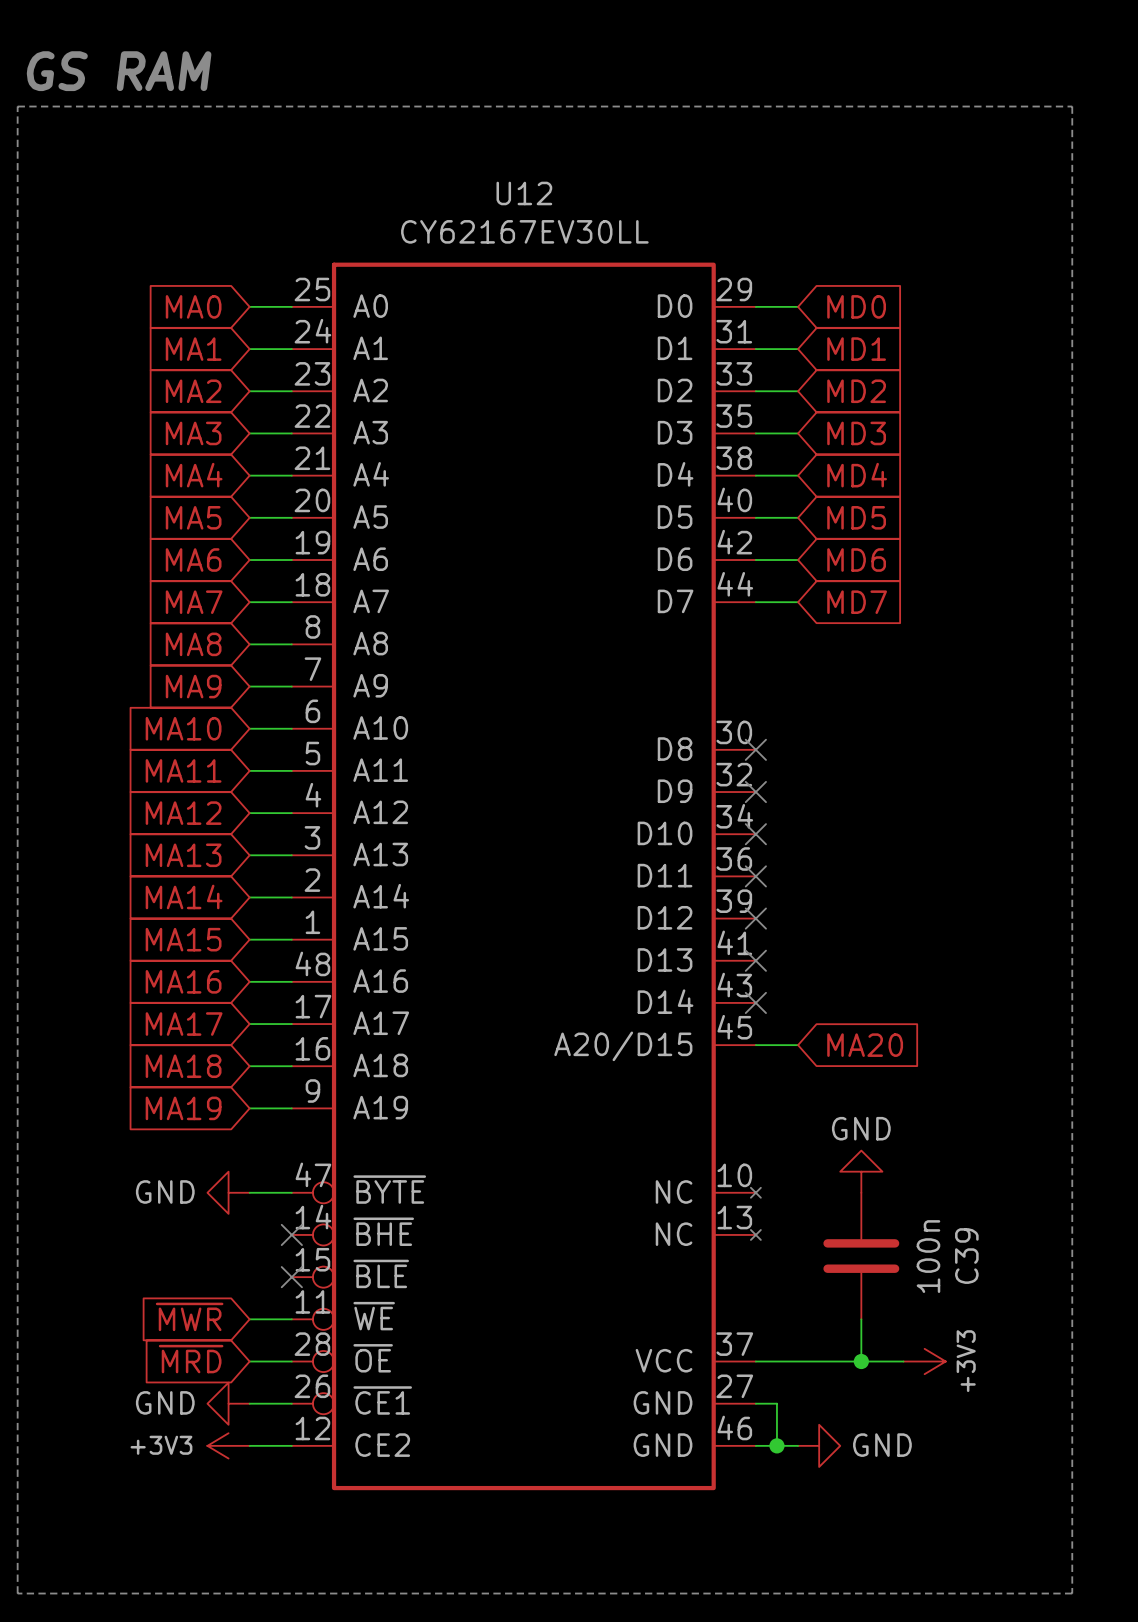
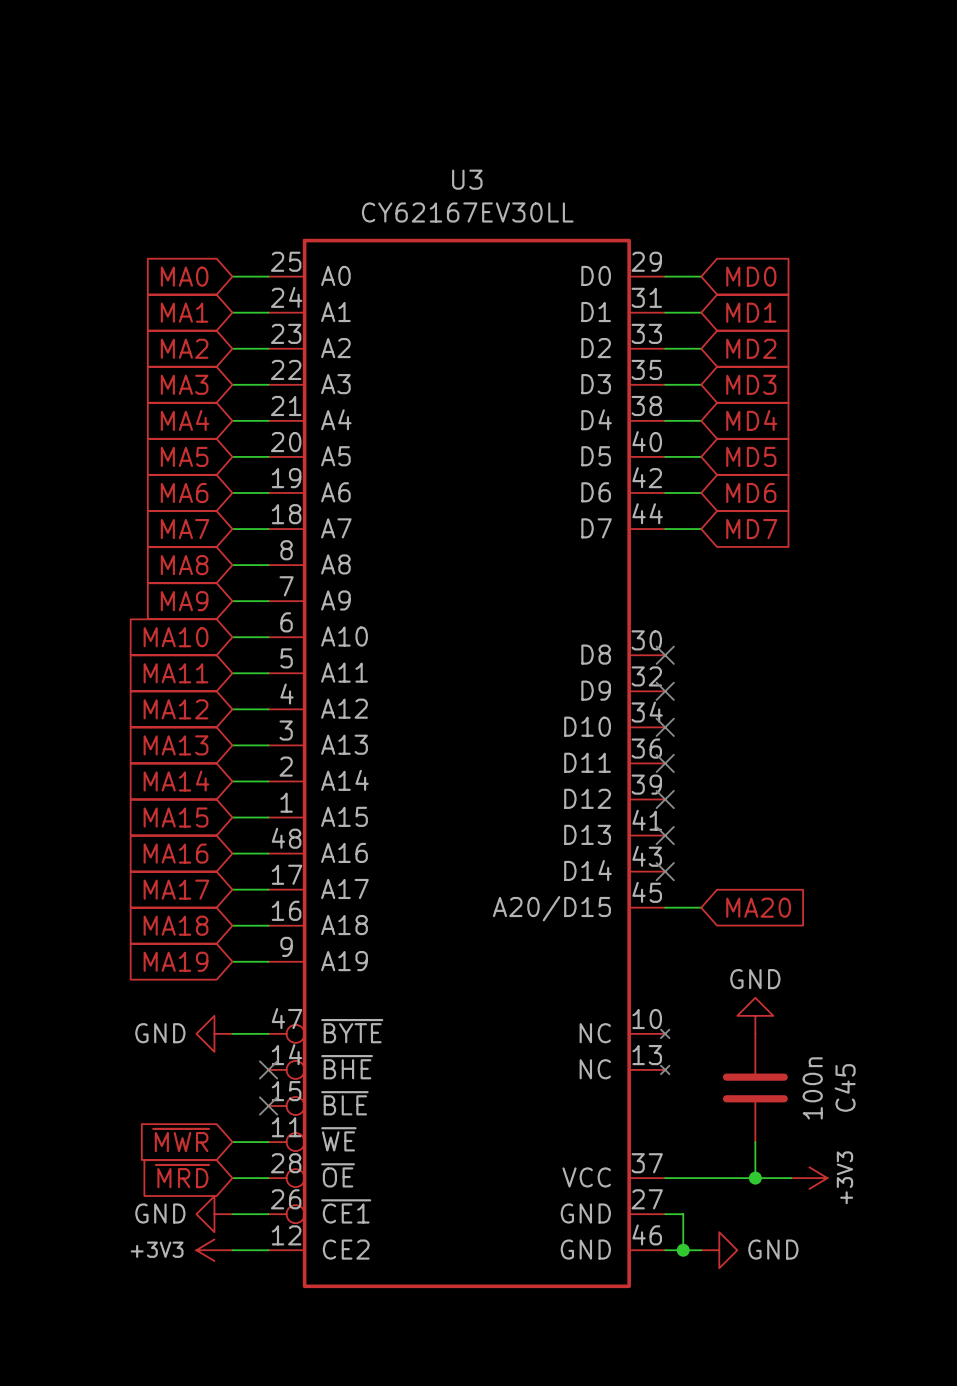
text: GS RAM (119, 71) -> none
line: (17, 106) (1072, 106) (1072, 1593) (17, 1593) (17, 106) -> none
U12 name: U12 (524, 193) -> U3 (467, 179)
C39 name: C39 (966, 1256) -> C45 (845, 1087)

